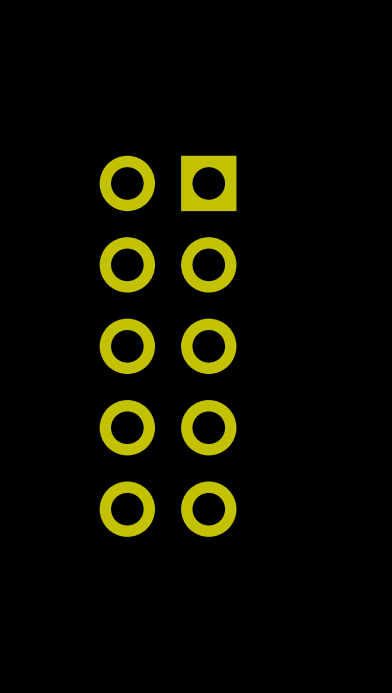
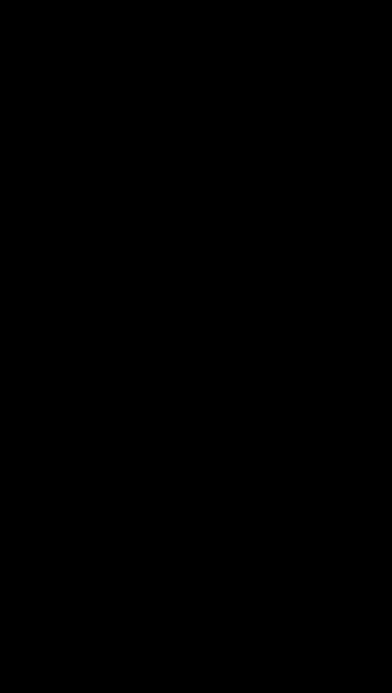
part: (168, 346) -> none

